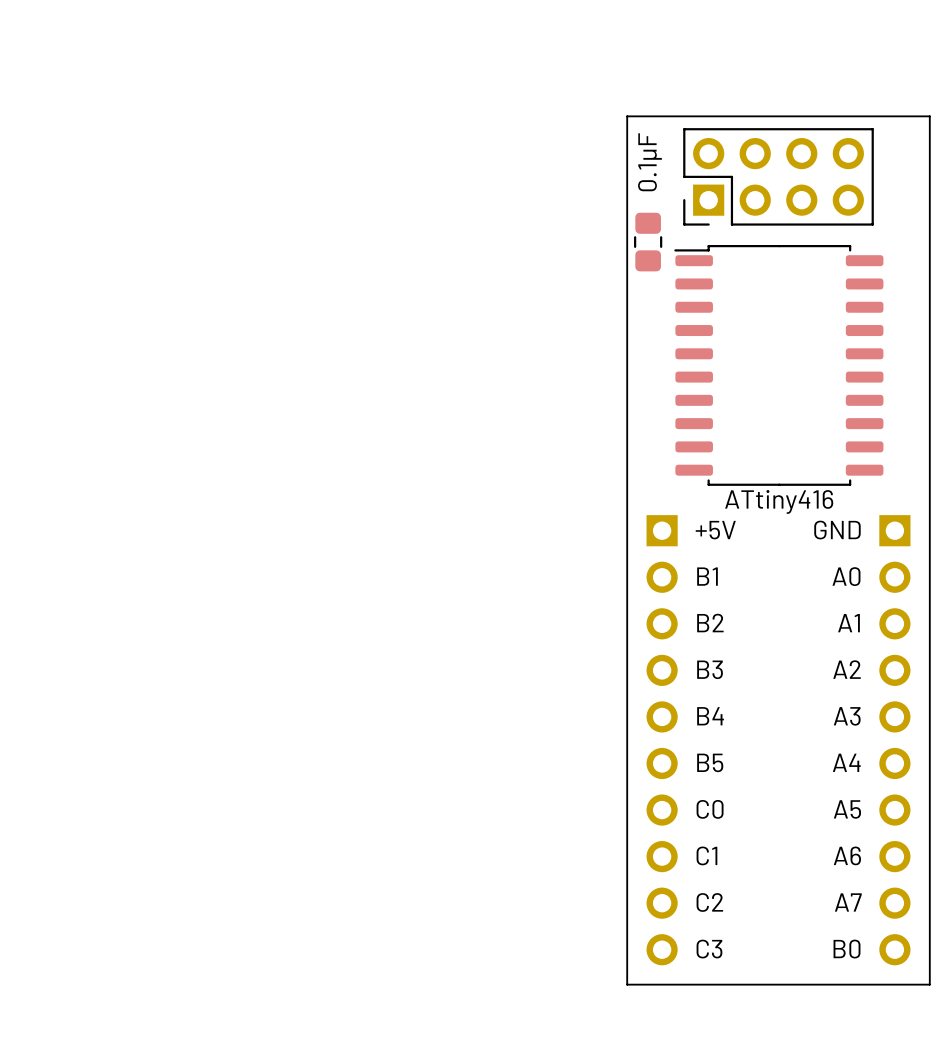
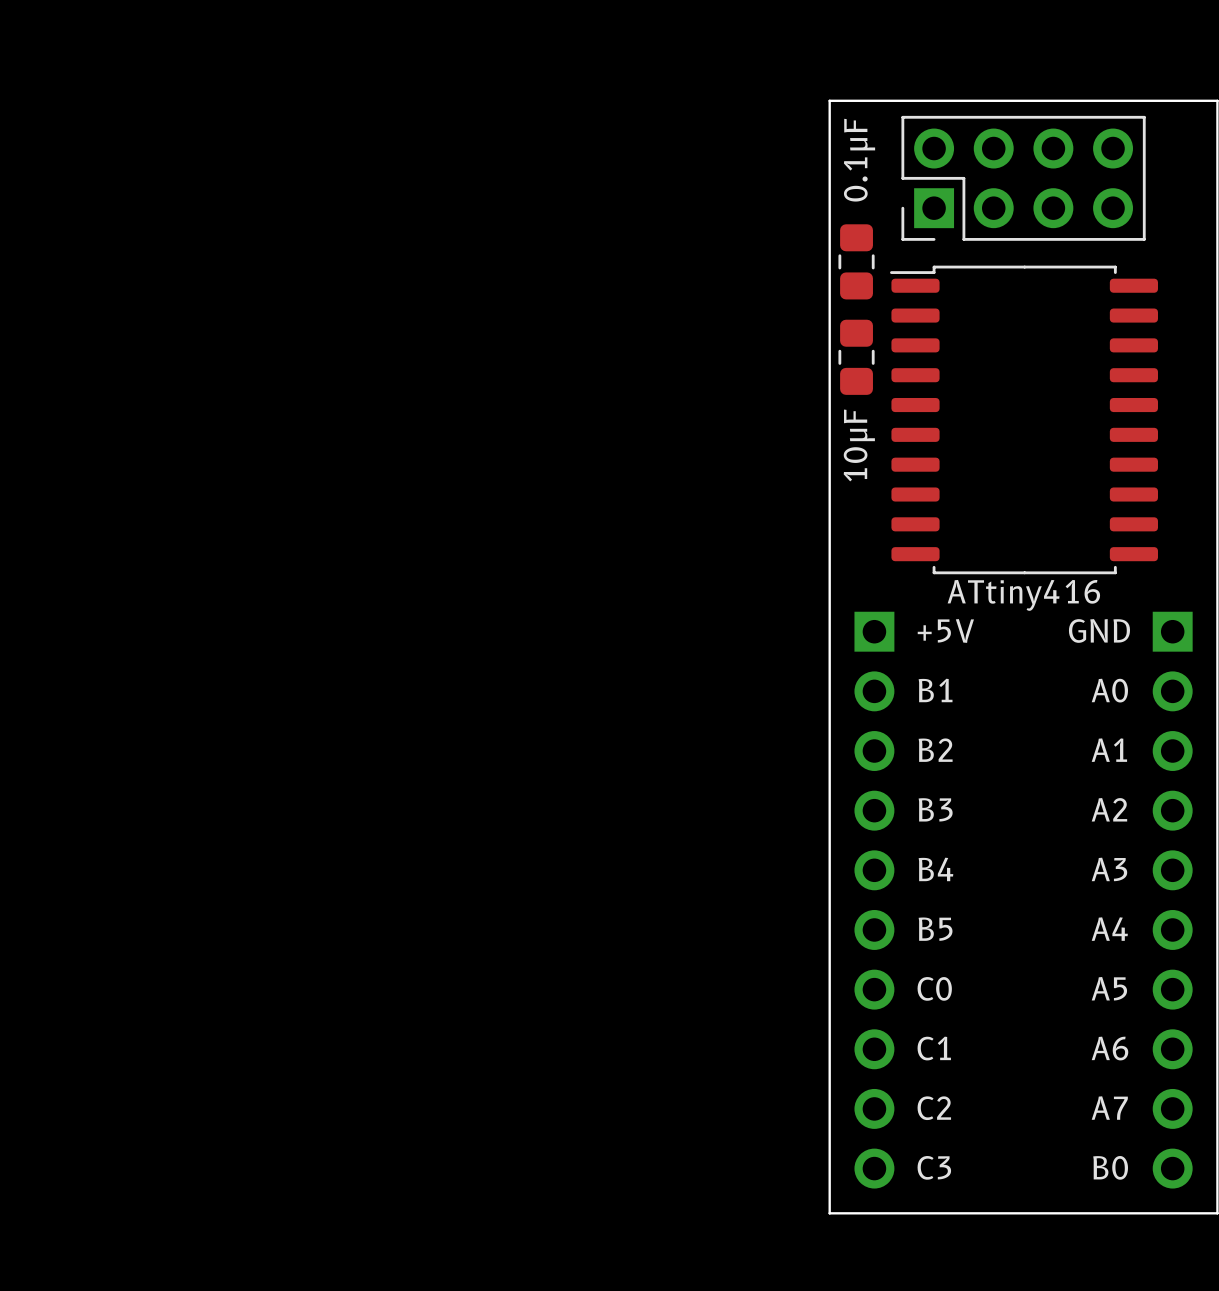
part: none -> 10μF (856, 357)

